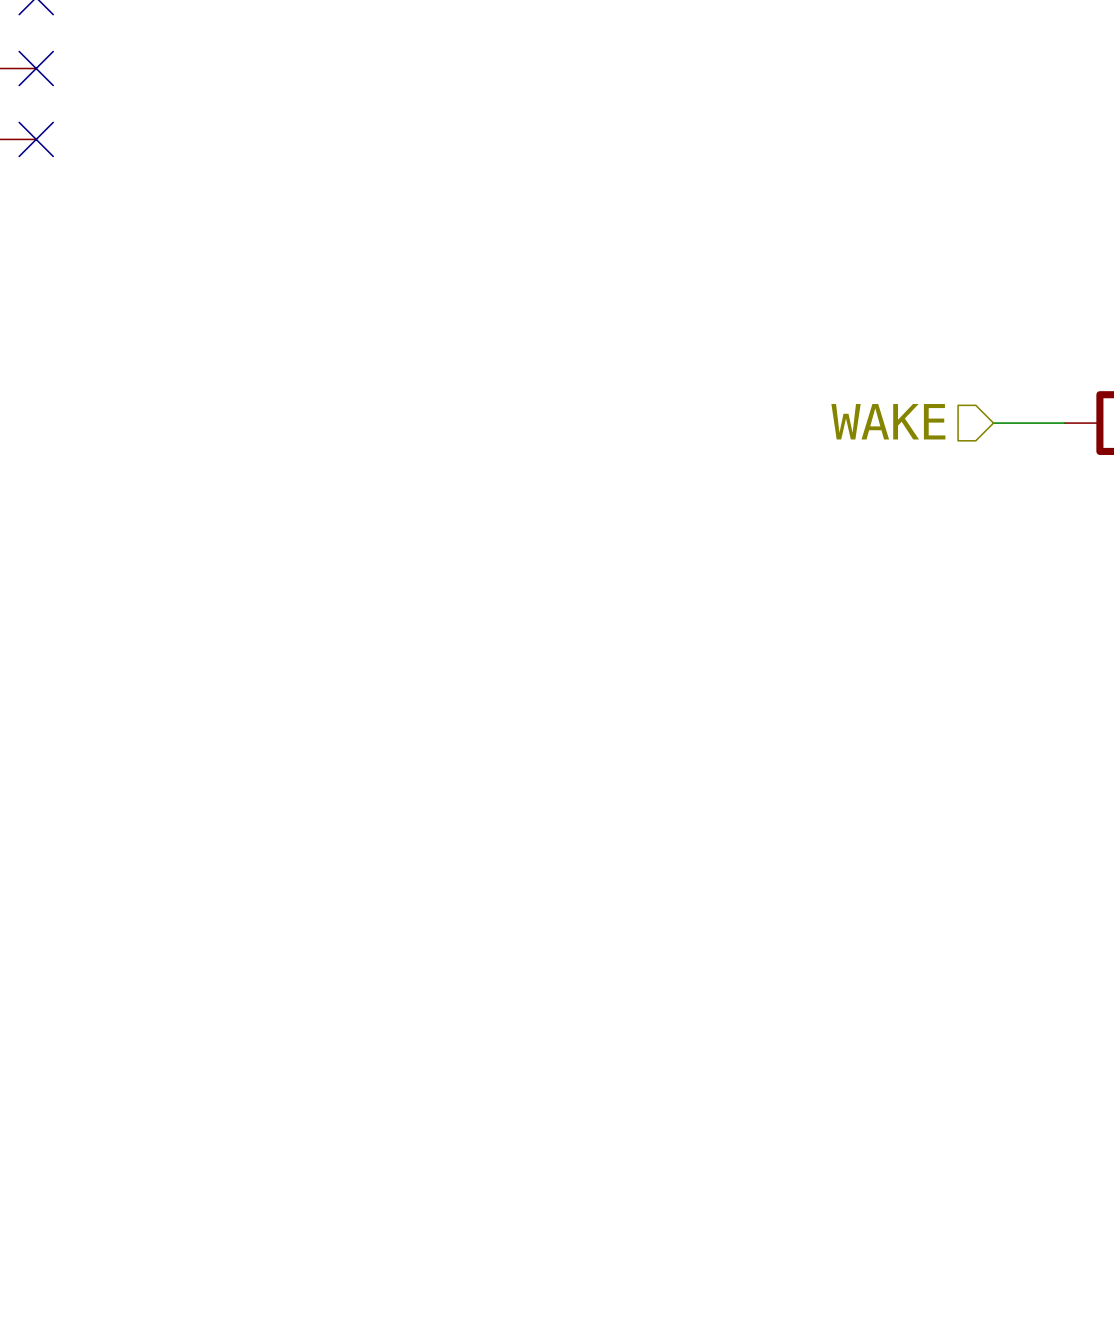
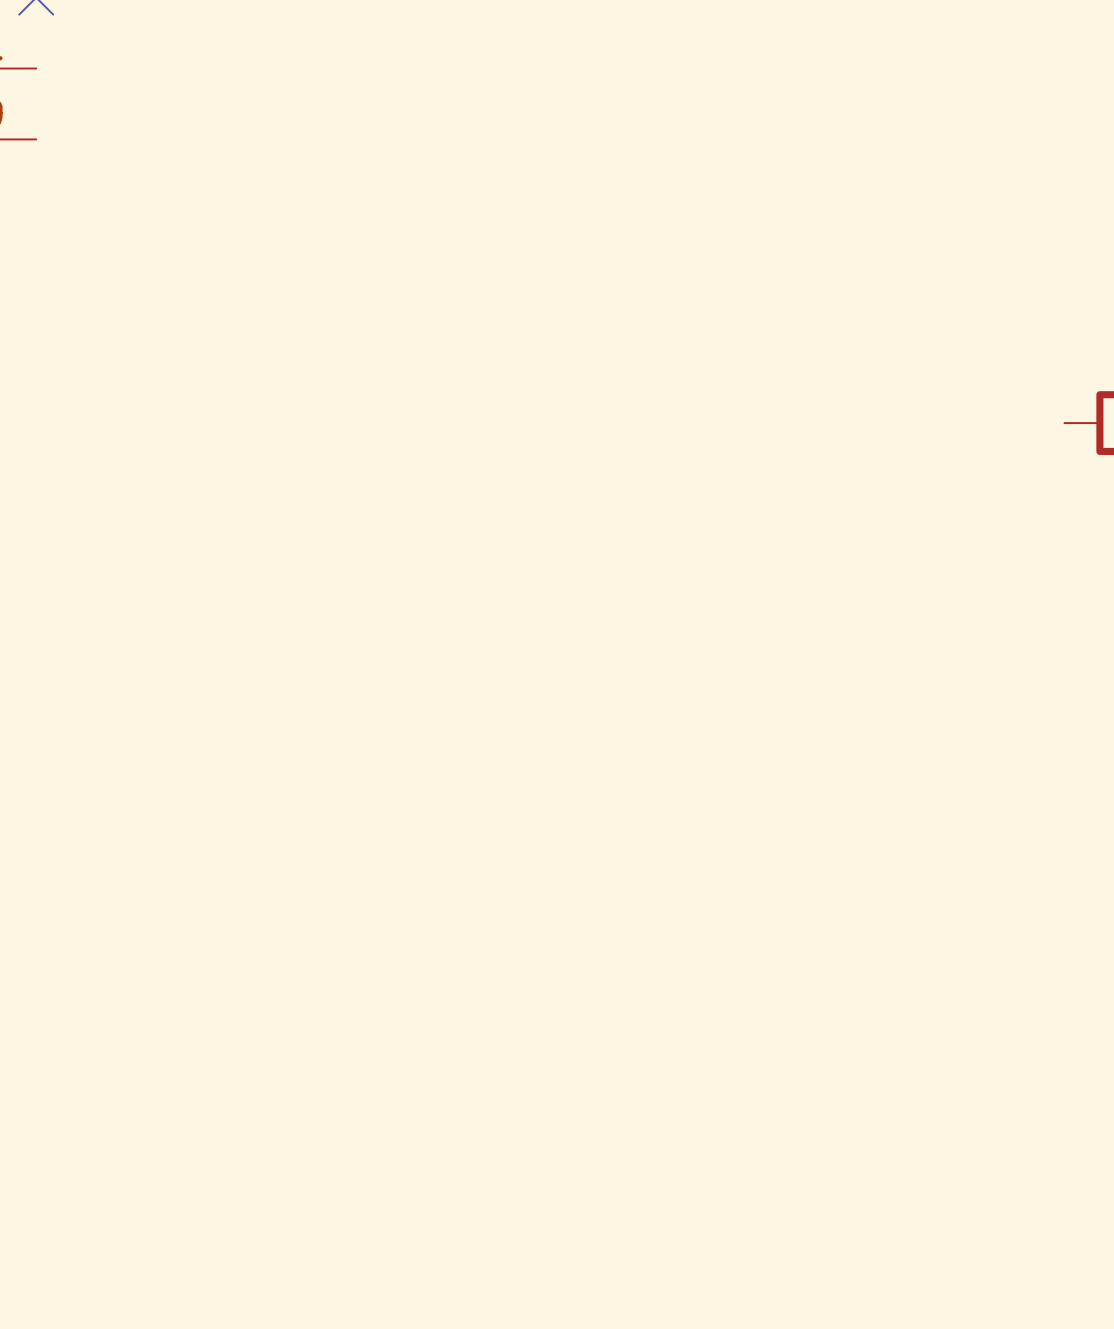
no-connect mark: (36, 68) -> none
no-connect mark: (36, 139) -> none
hierarchical label: WAKE (888, 421) -> none
wire: (993, 423) (1064, 423) -> none

